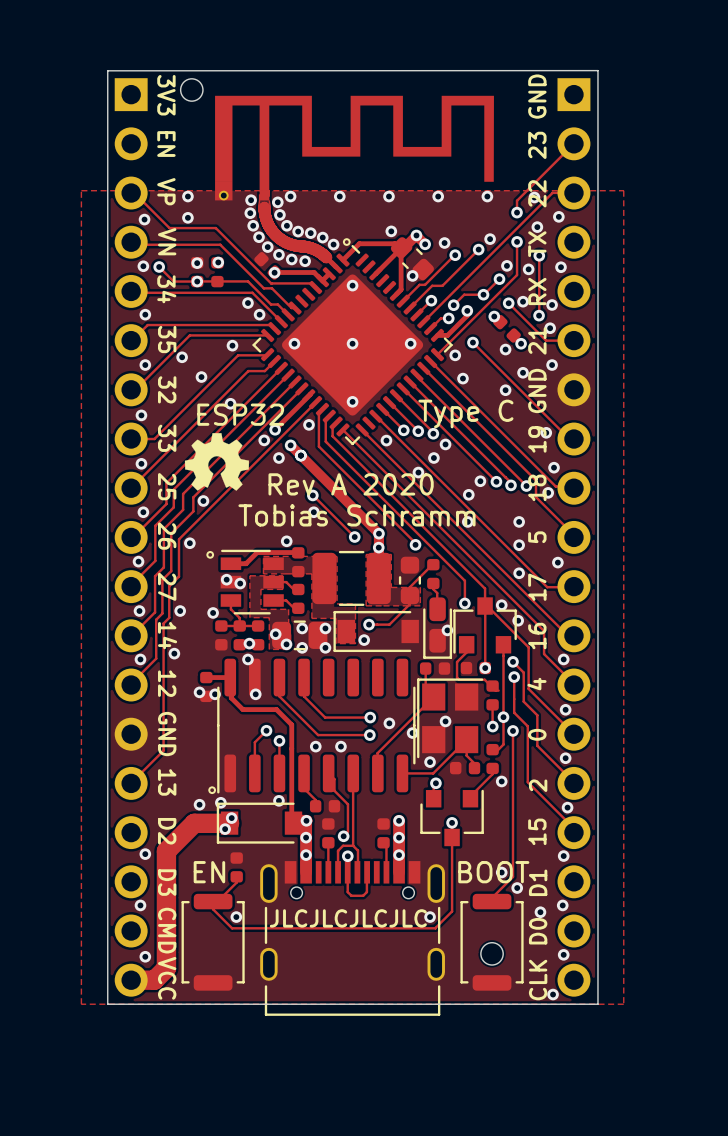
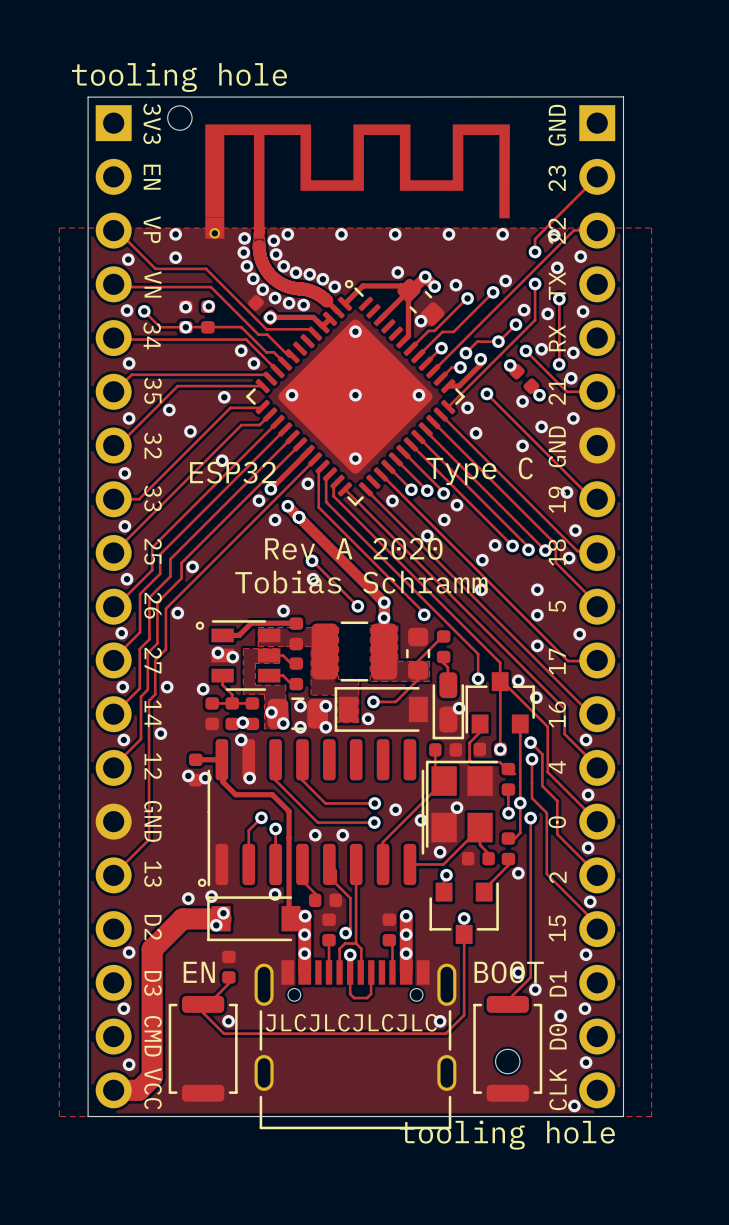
part text: none -> tooling hole (179, 77)
drawing: [184, 433, 250, 491] -> none
part text: none -> tooling hole (507, 1135)

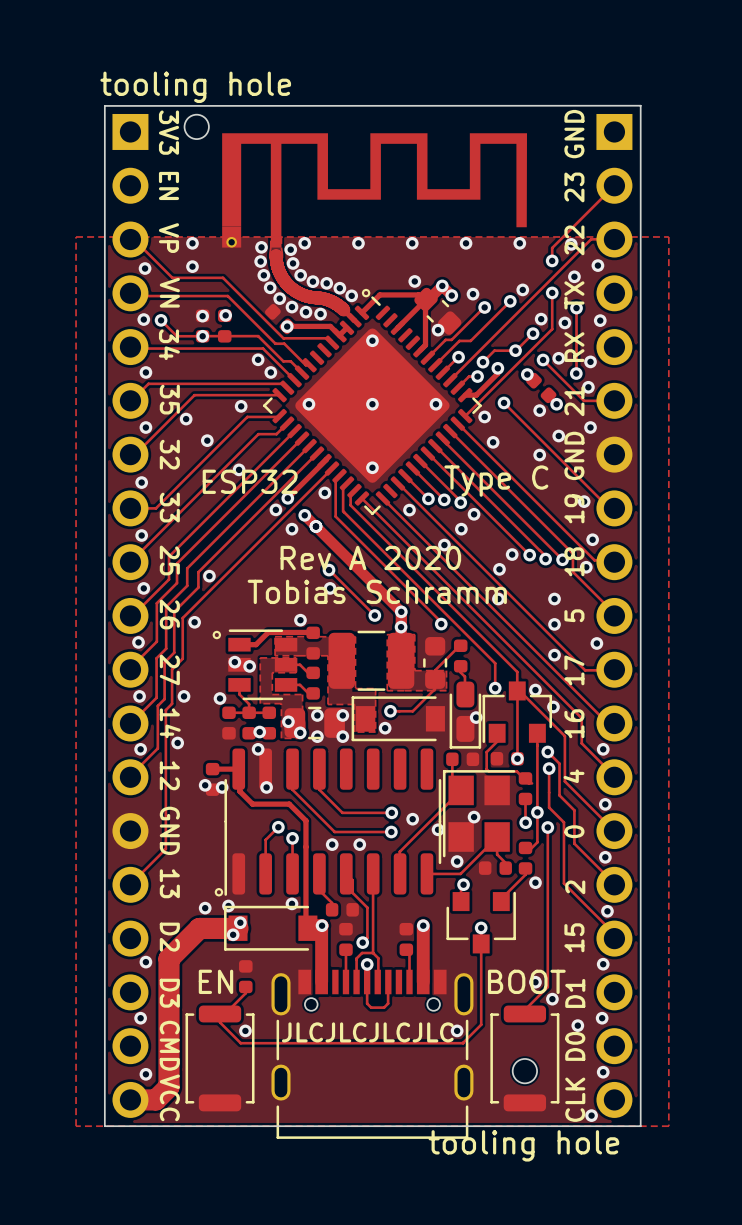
via: (304, 934) -> none
via: (406, 934) -> none
via: (304, 953) -> none
via: (406, 953) -> none

